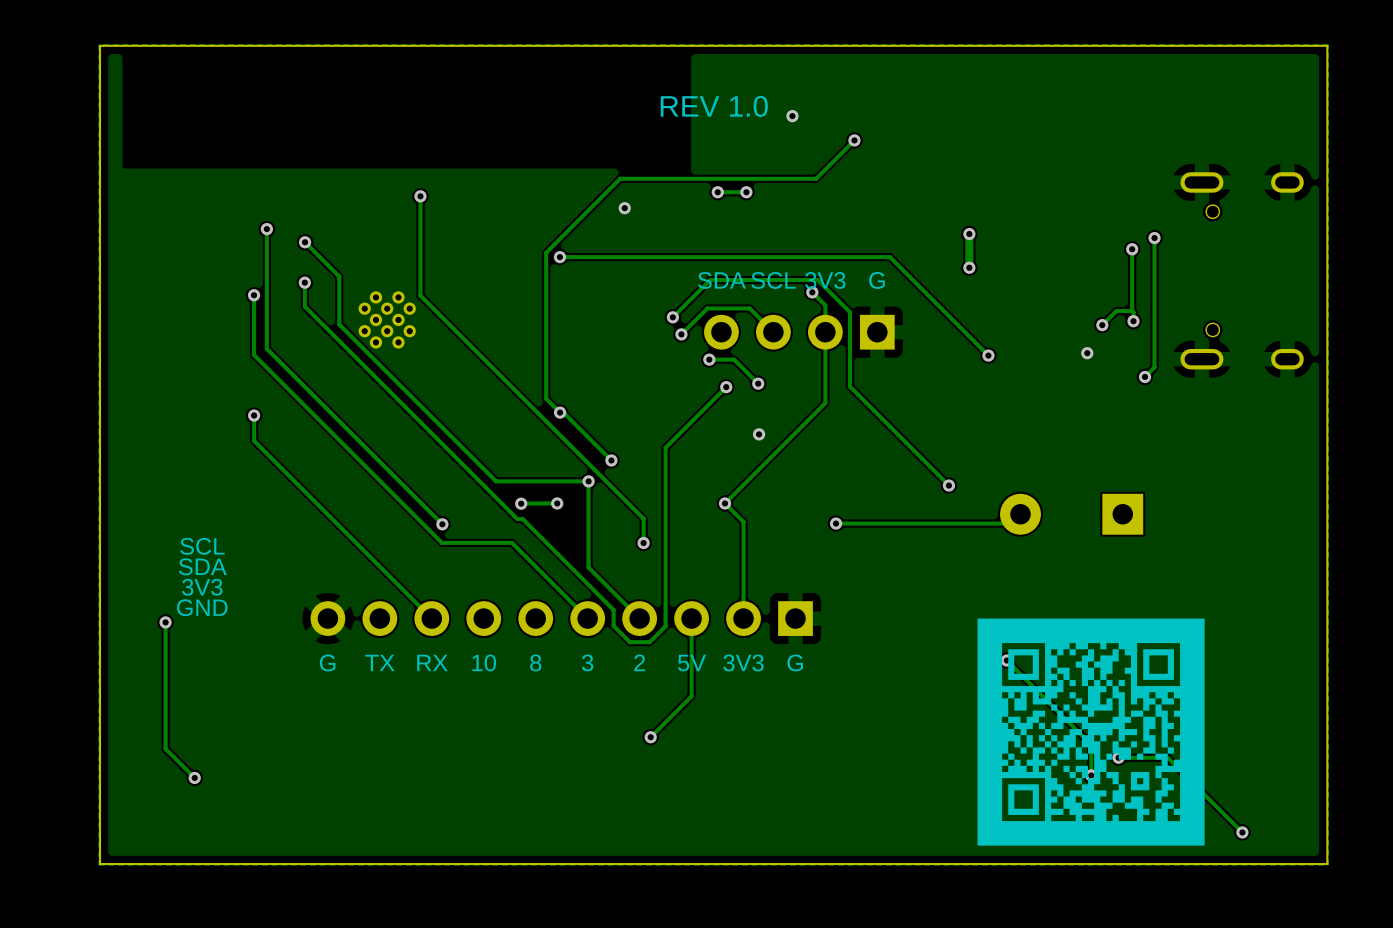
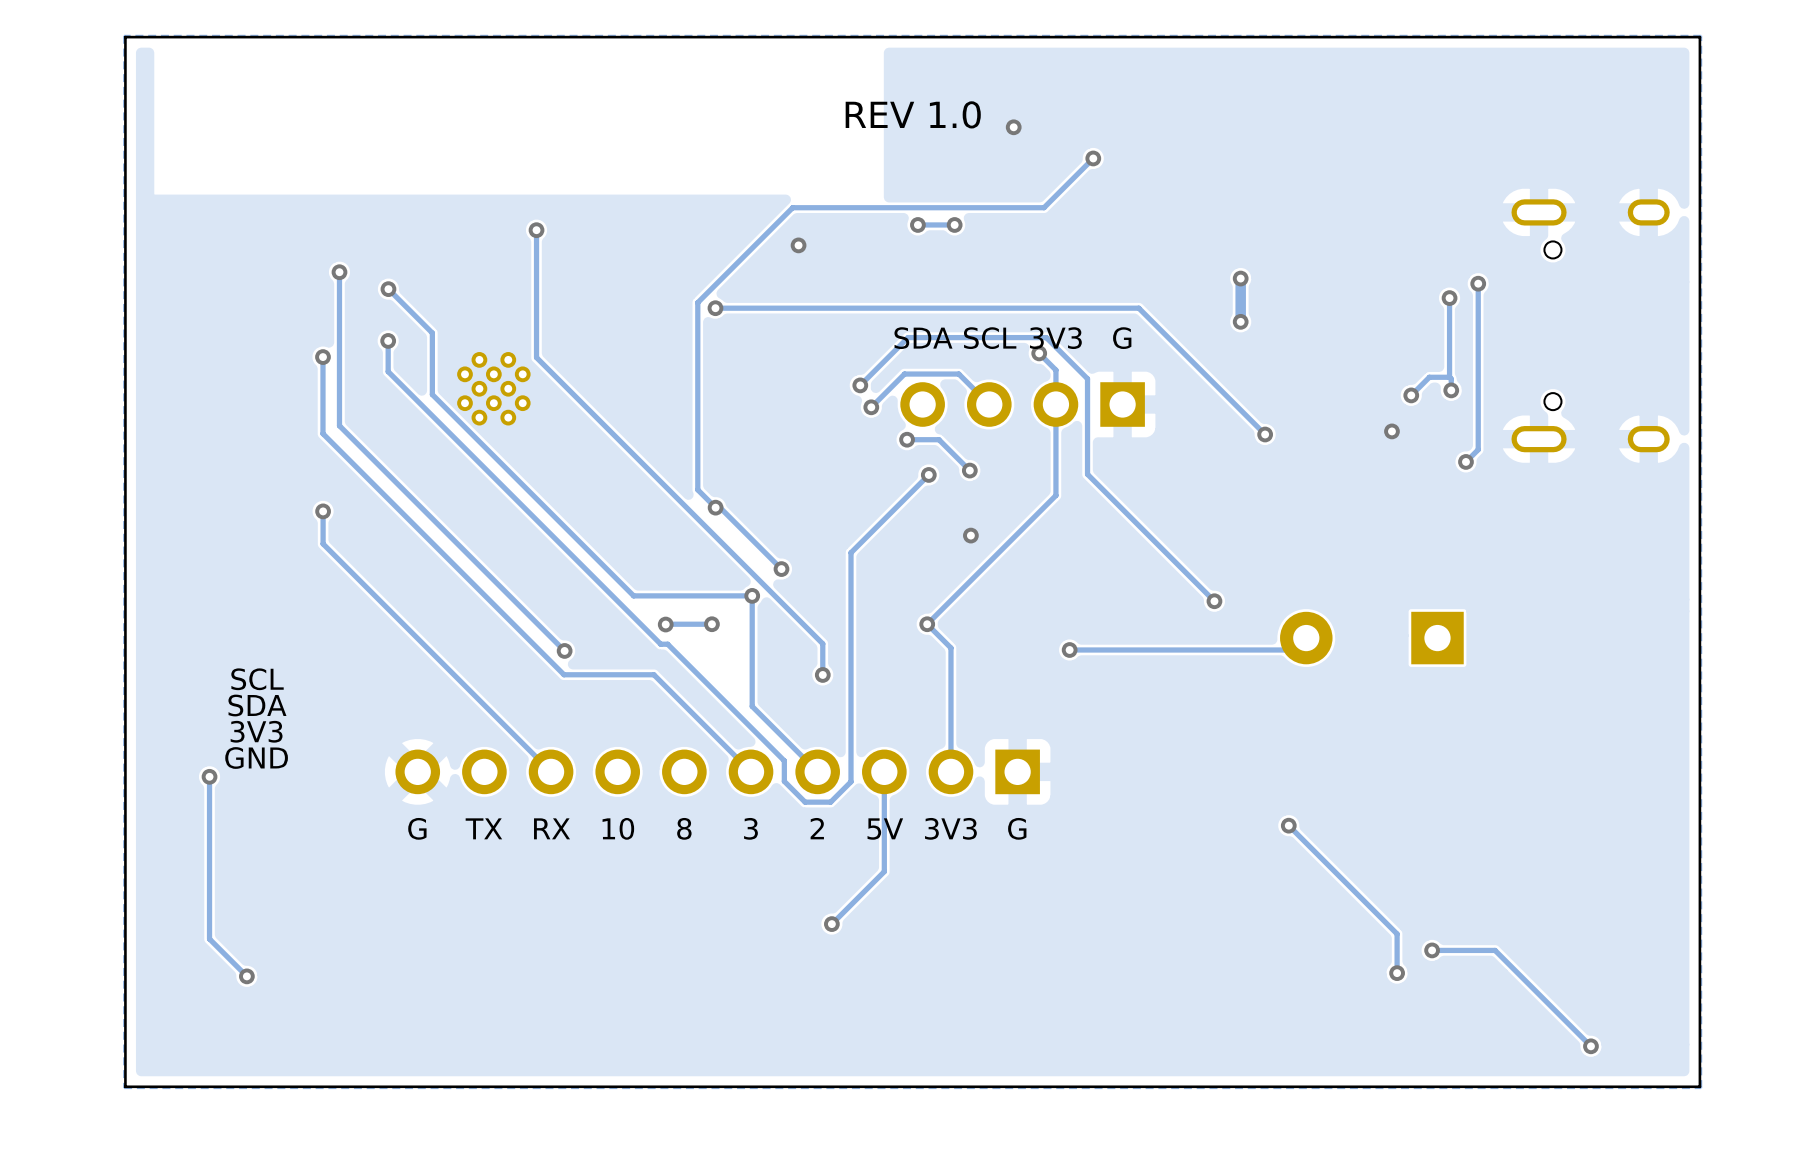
drawing: [977, 618, 1205, 846] -> none

